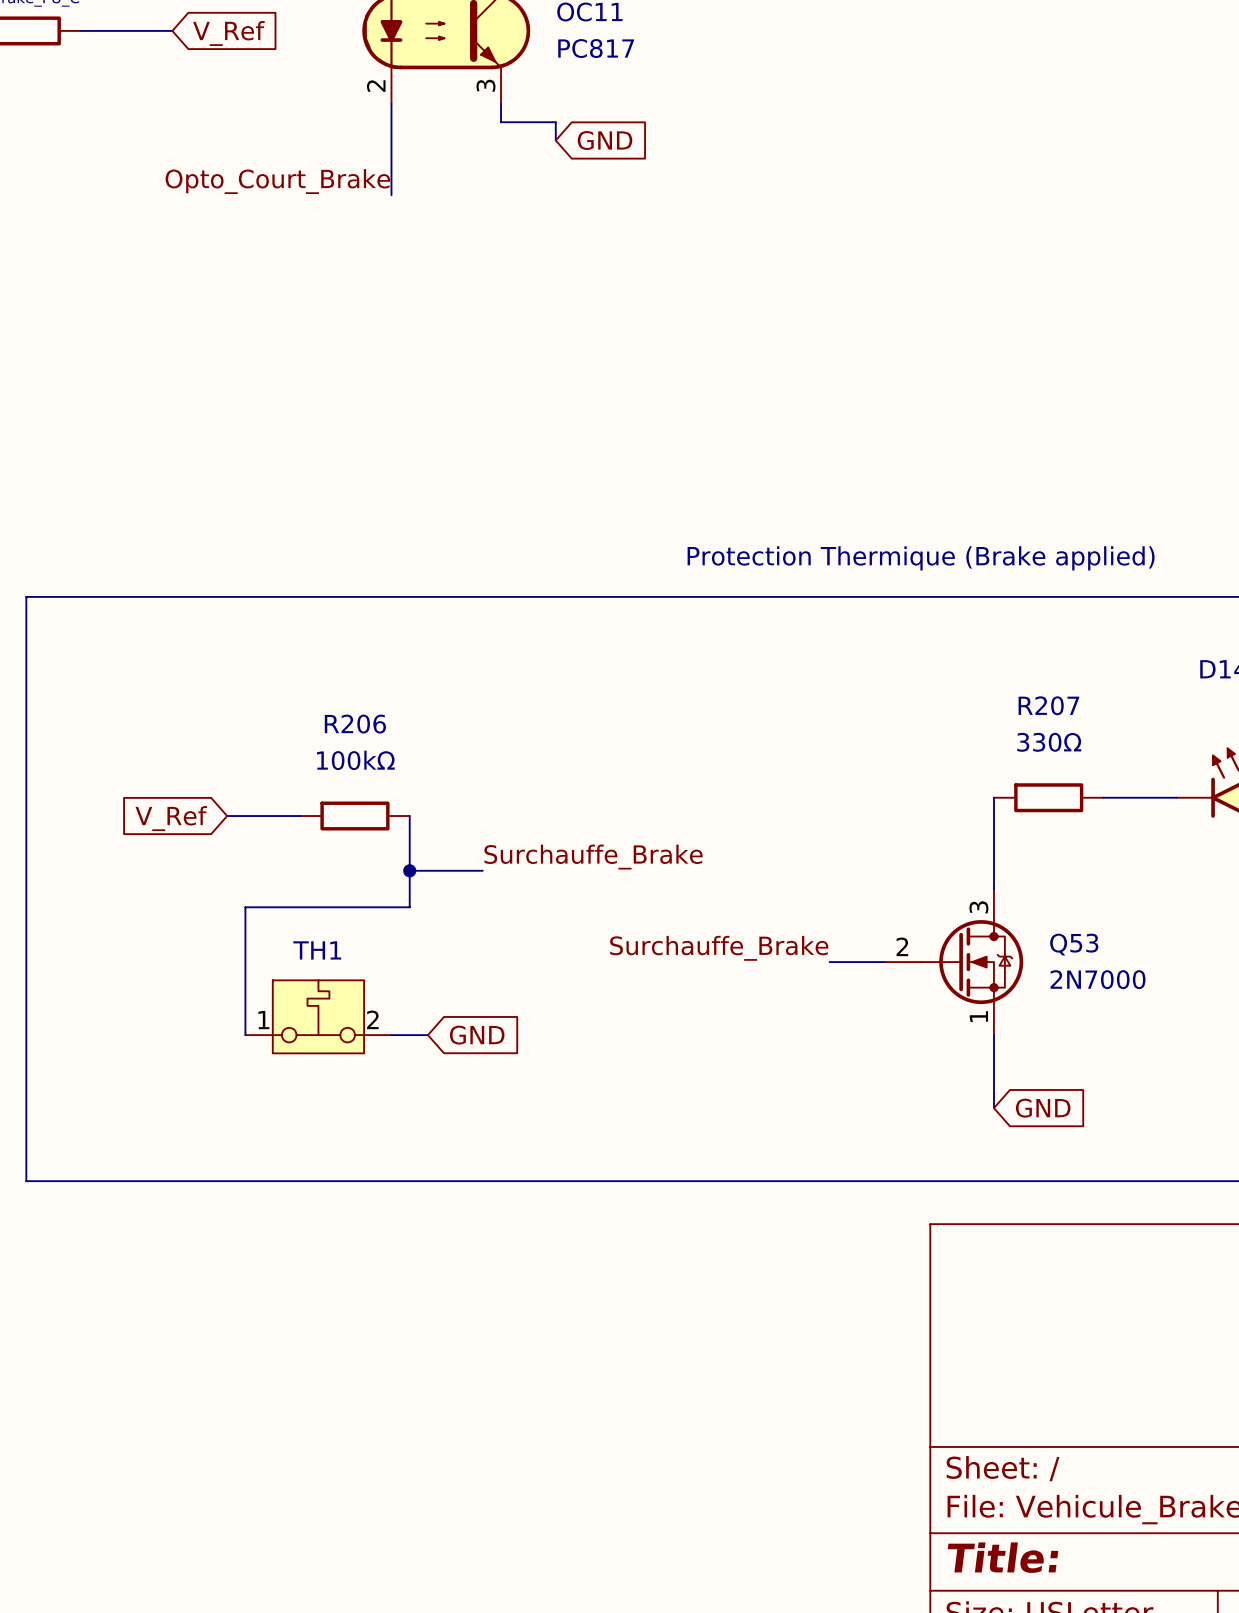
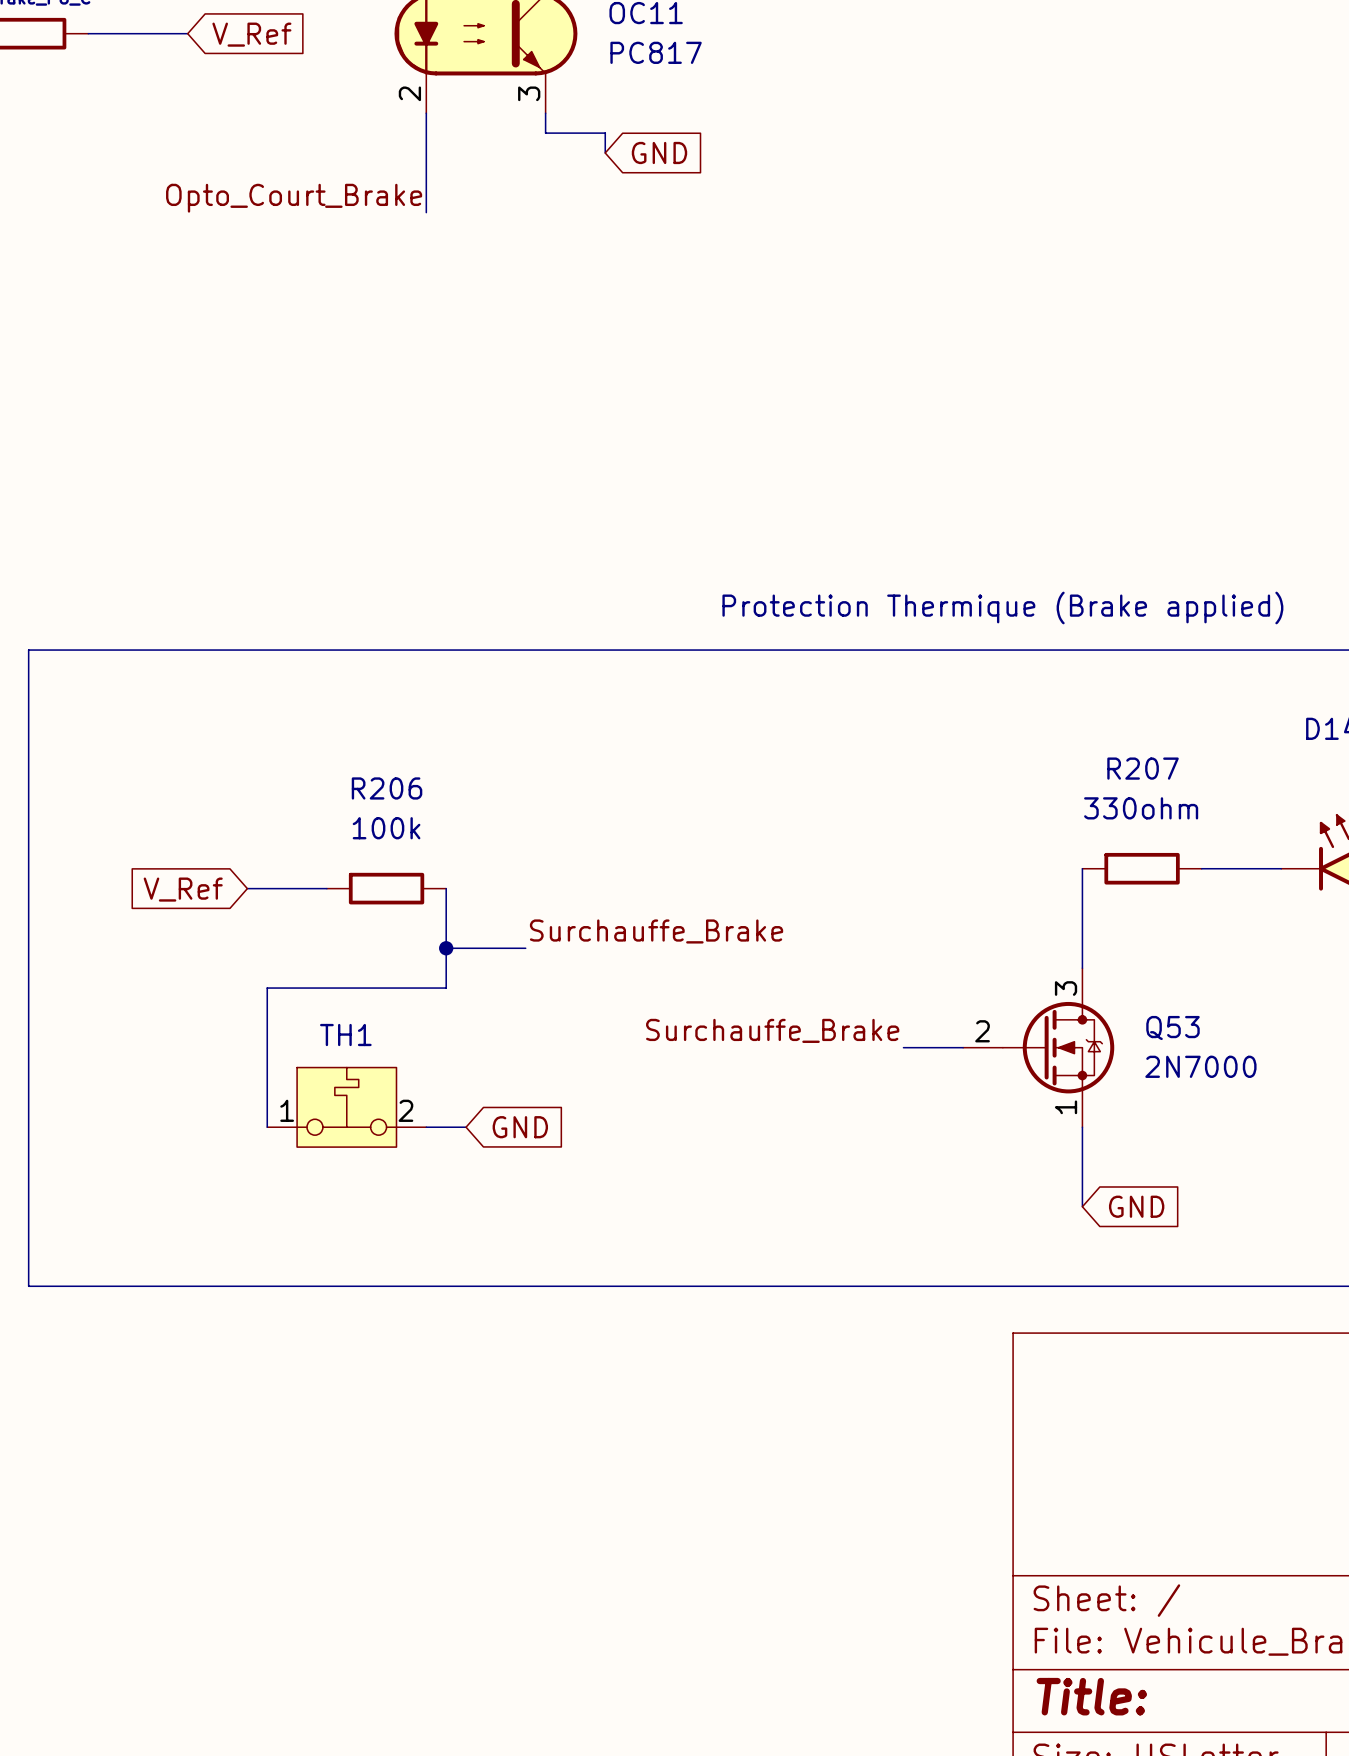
R207 value: 330Ω (1049, 742) -> 330ohm (1141, 808)
R206 value: 100kΩ (355, 760) -> 100k (386, 828)

